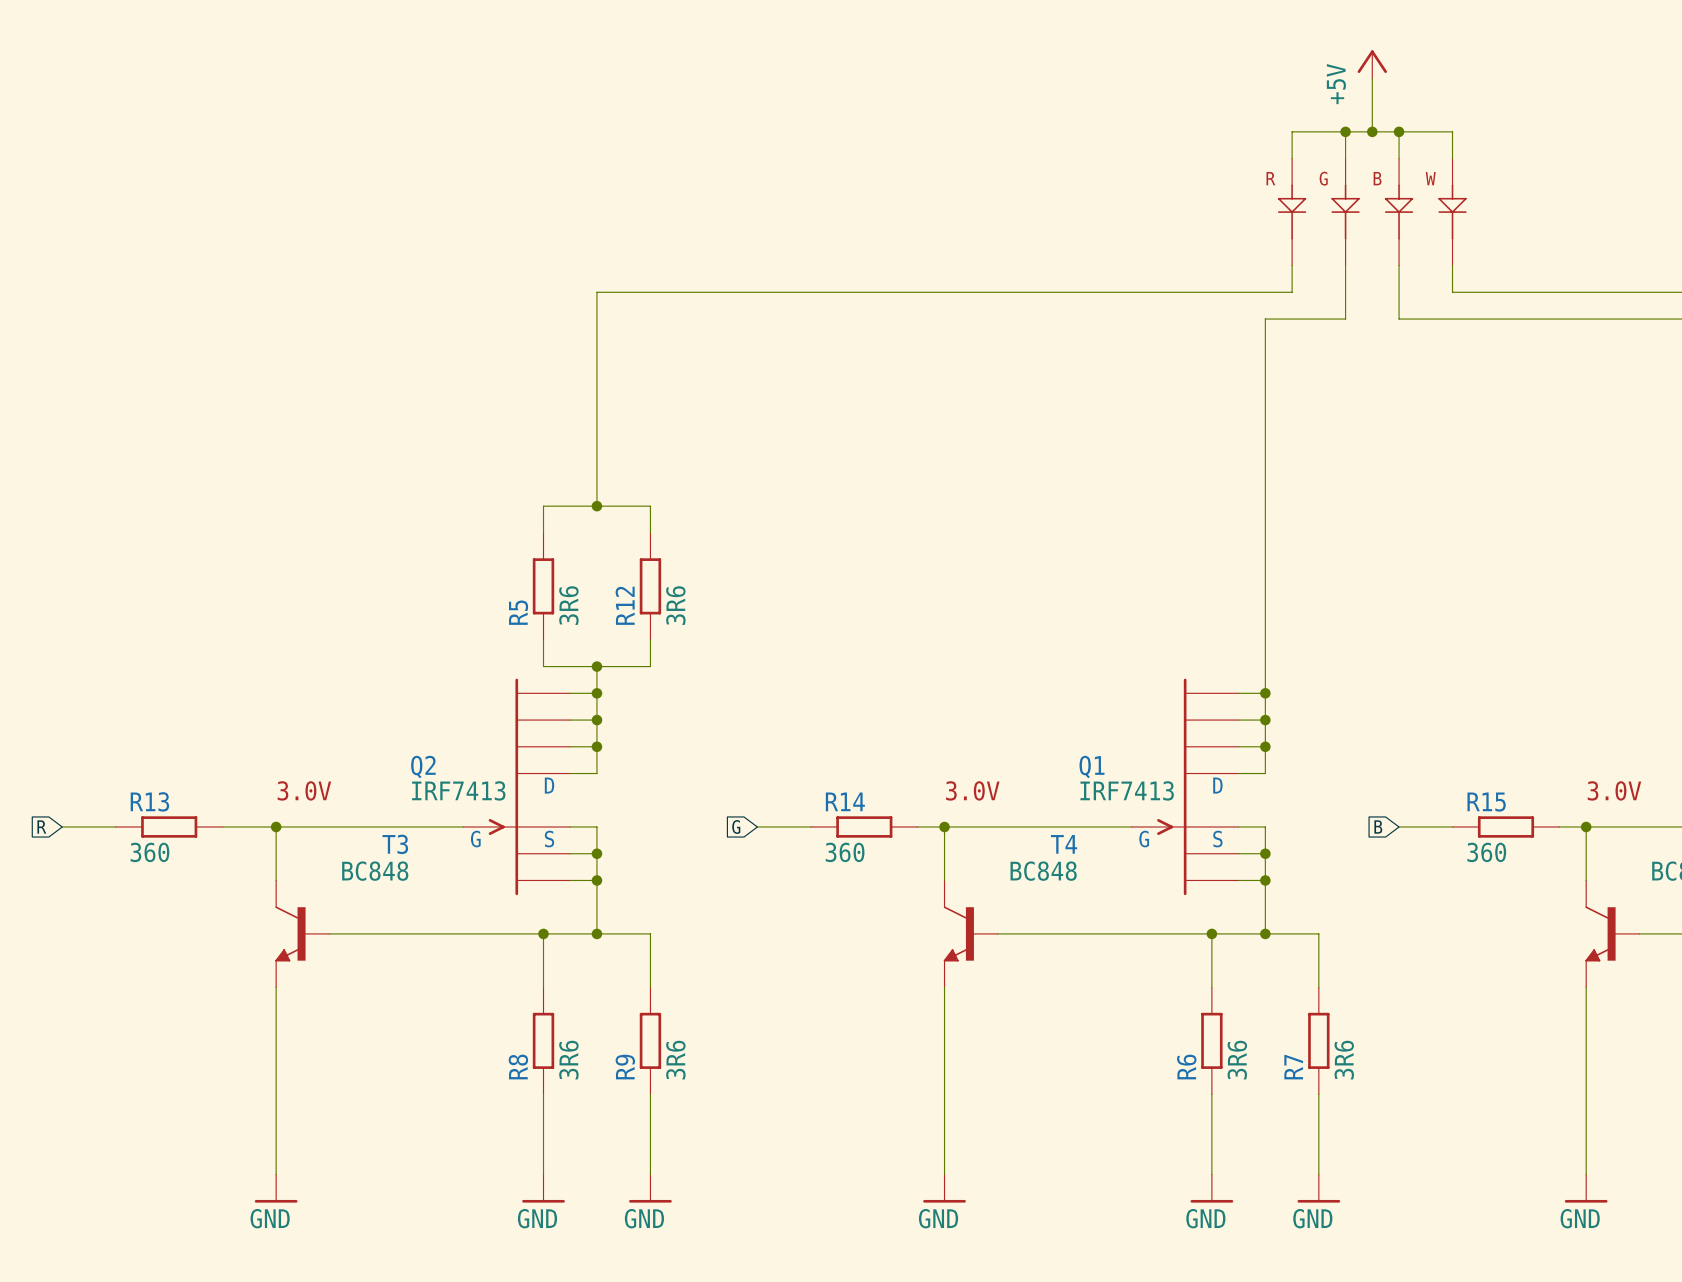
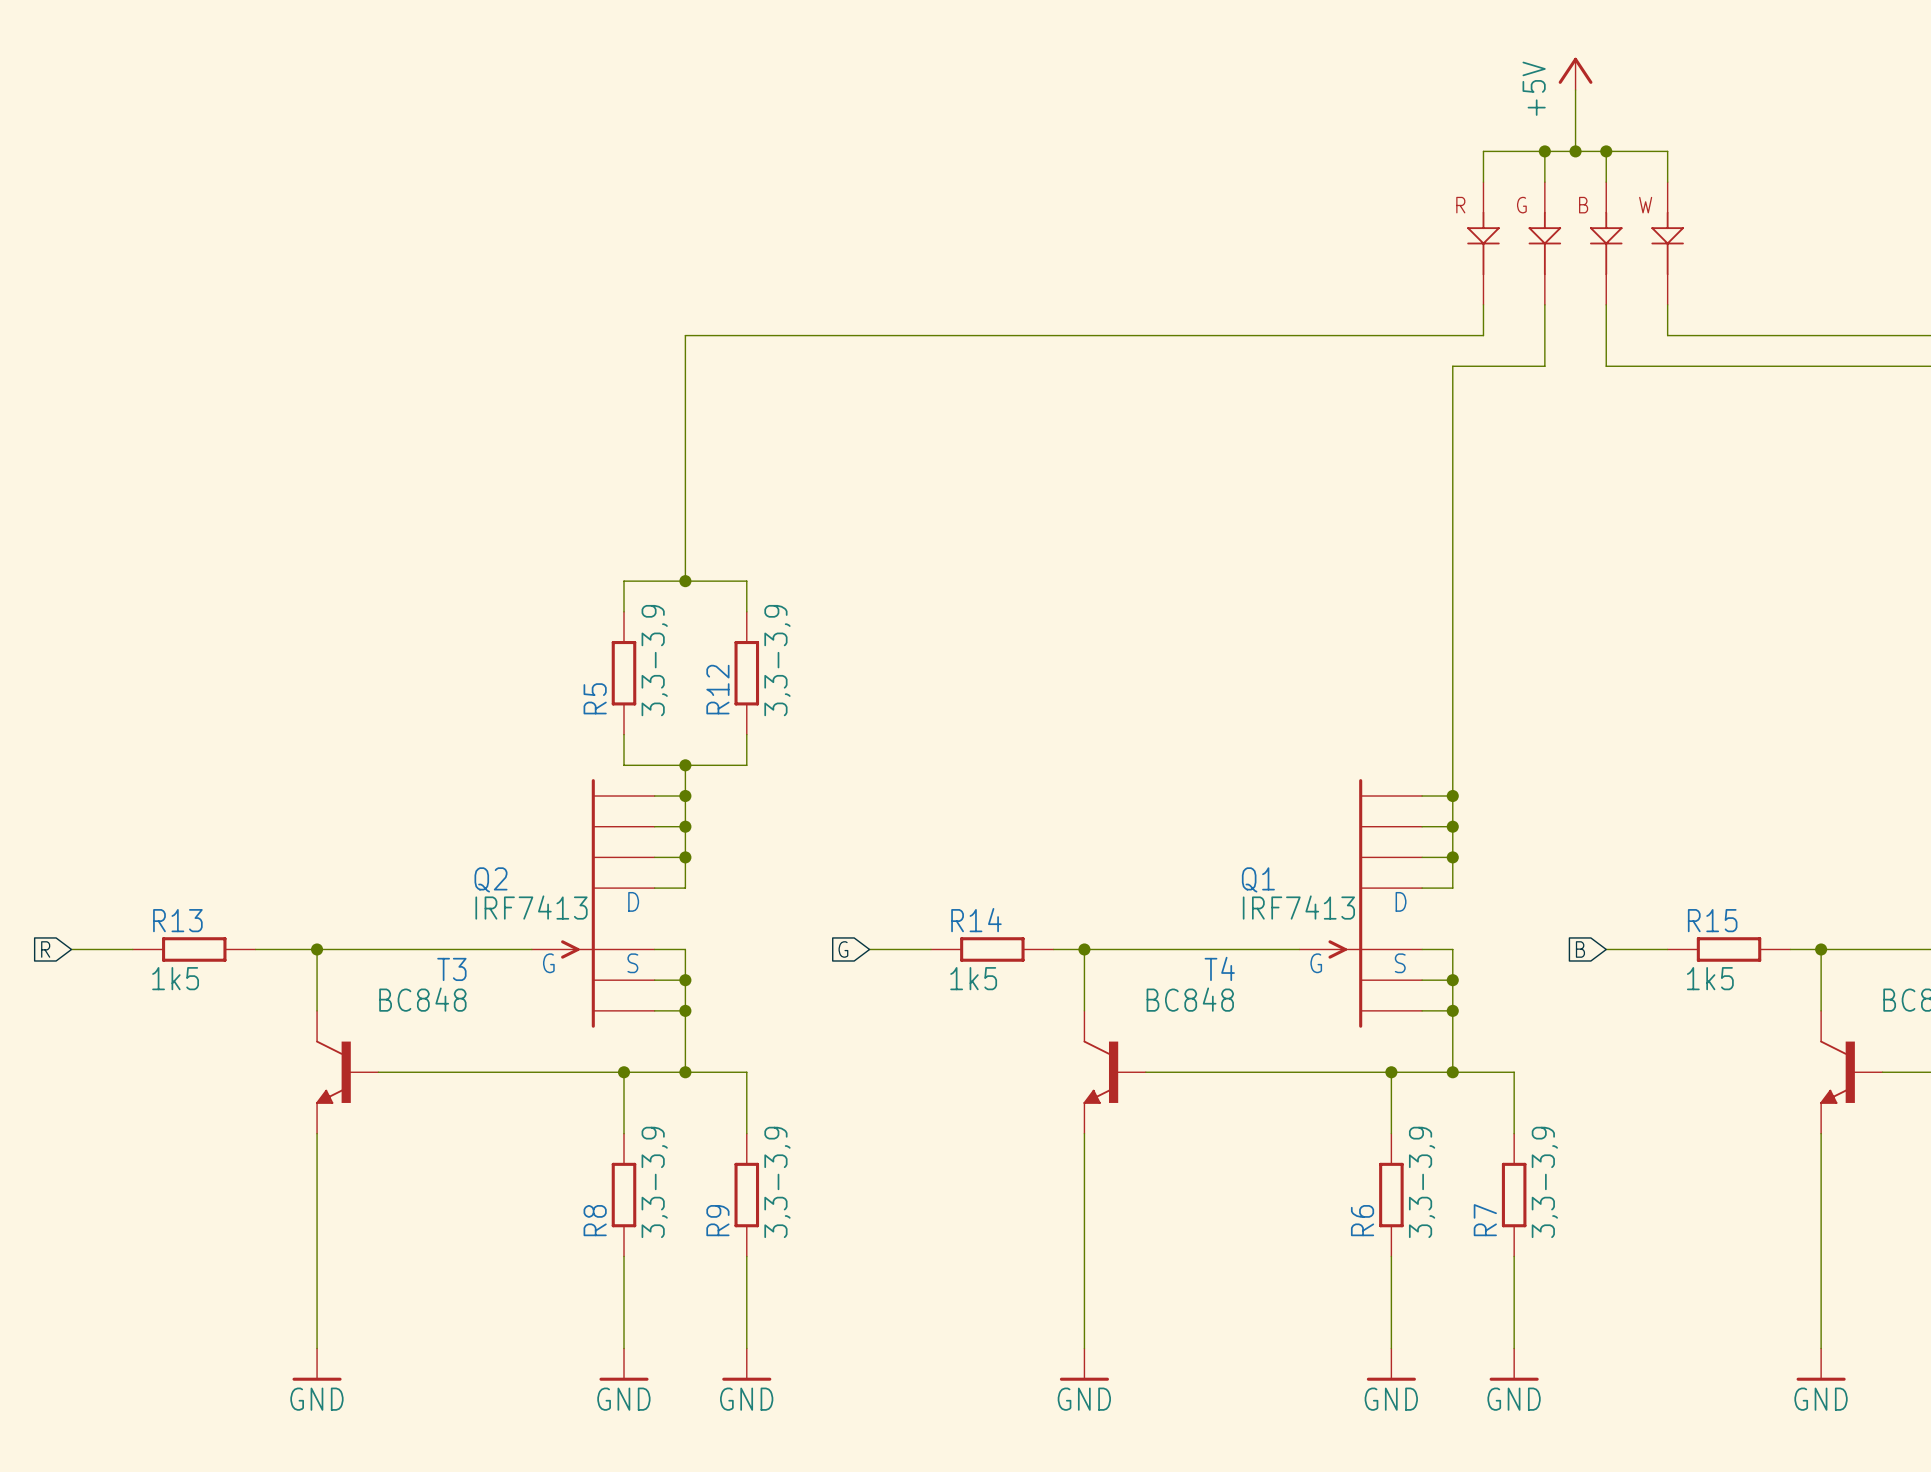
R5 value: 3R6 (568, 605) -> 3,3-3,9 (654, 660)
R12 value: 3R6 (675, 605) -> 3,3-3,9 (777, 660)
text: 3.0V (304, 790) -> none
text: 3.0V (972, 790) -> none
text: 3.0V (1614, 790) -> none
R13 value: 360 (149, 852) -> 1k5 (175, 978)
R14 value: 360 (845, 852) -> 1k5 (973, 978)
R15 value: 360 (1486, 852) -> 1k5 (1710, 978)
R8 value: 3R6 (568, 1060) -> 3,3-3,9 (654, 1182)
R9 value: 3R6 (675, 1060) -> 3,3-3,9 (777, 1182)
R6 value: 3R6 (1237, 1060) -> 3,3-3,9 (1422, 1182)
R7 value: 3R6 (1344, 1060) -> 3,3-3,9 (1544, 1182)

